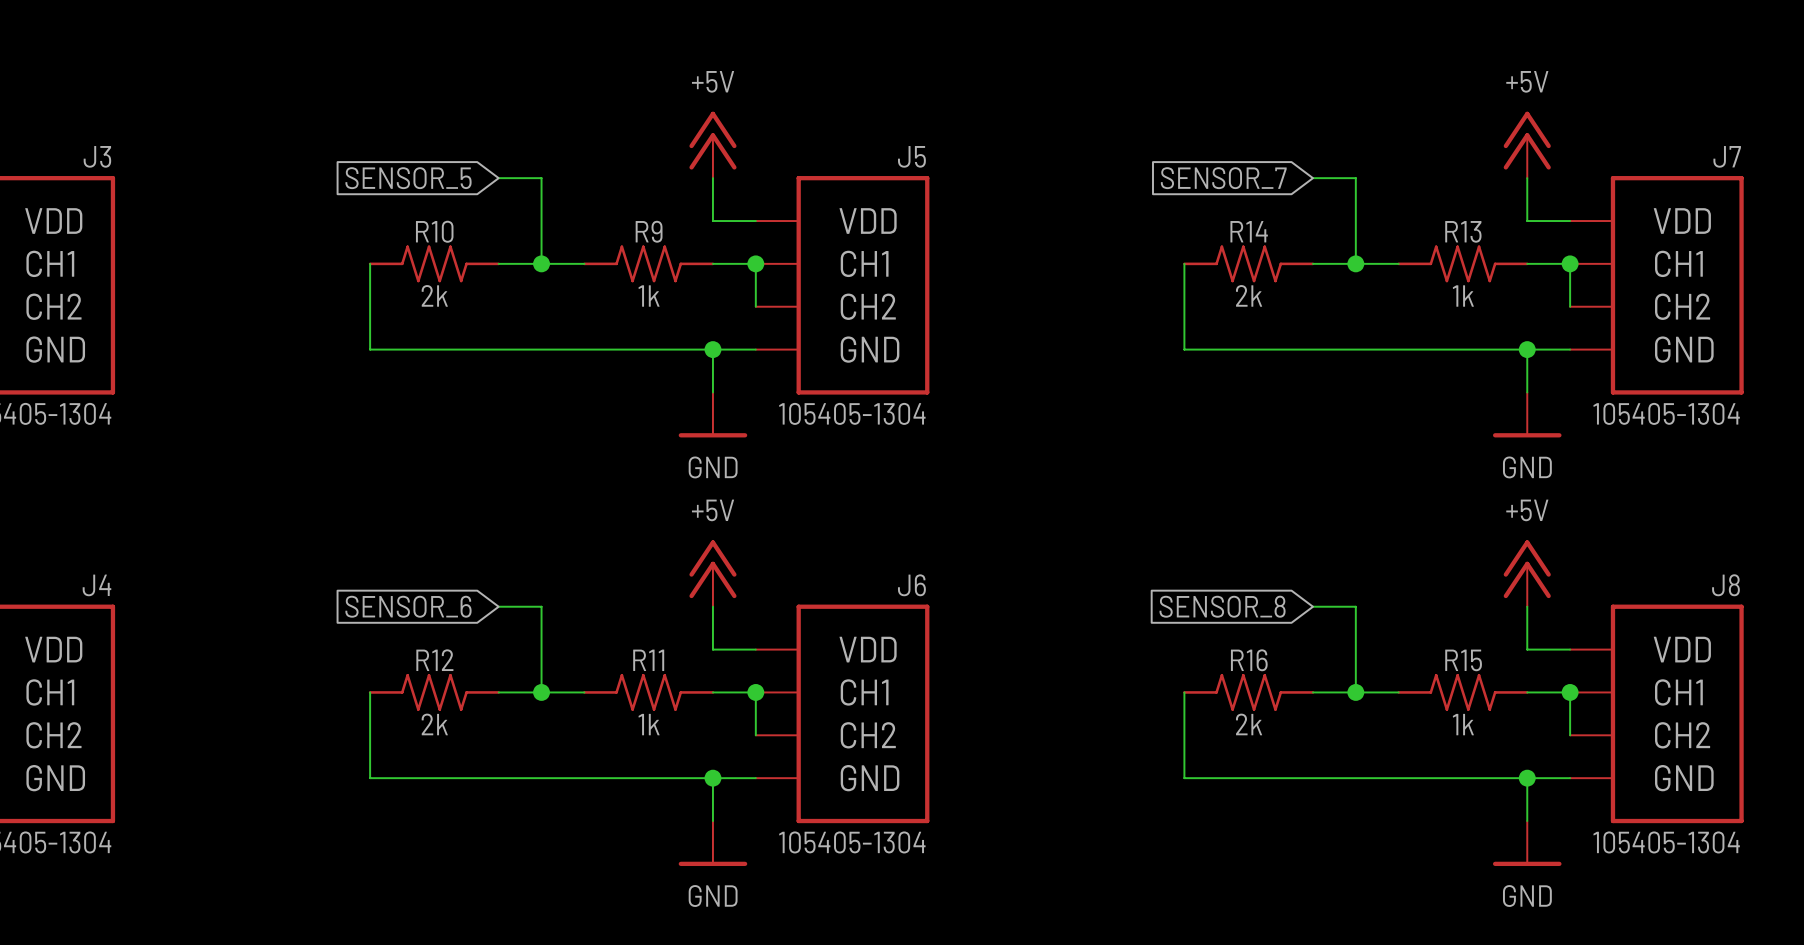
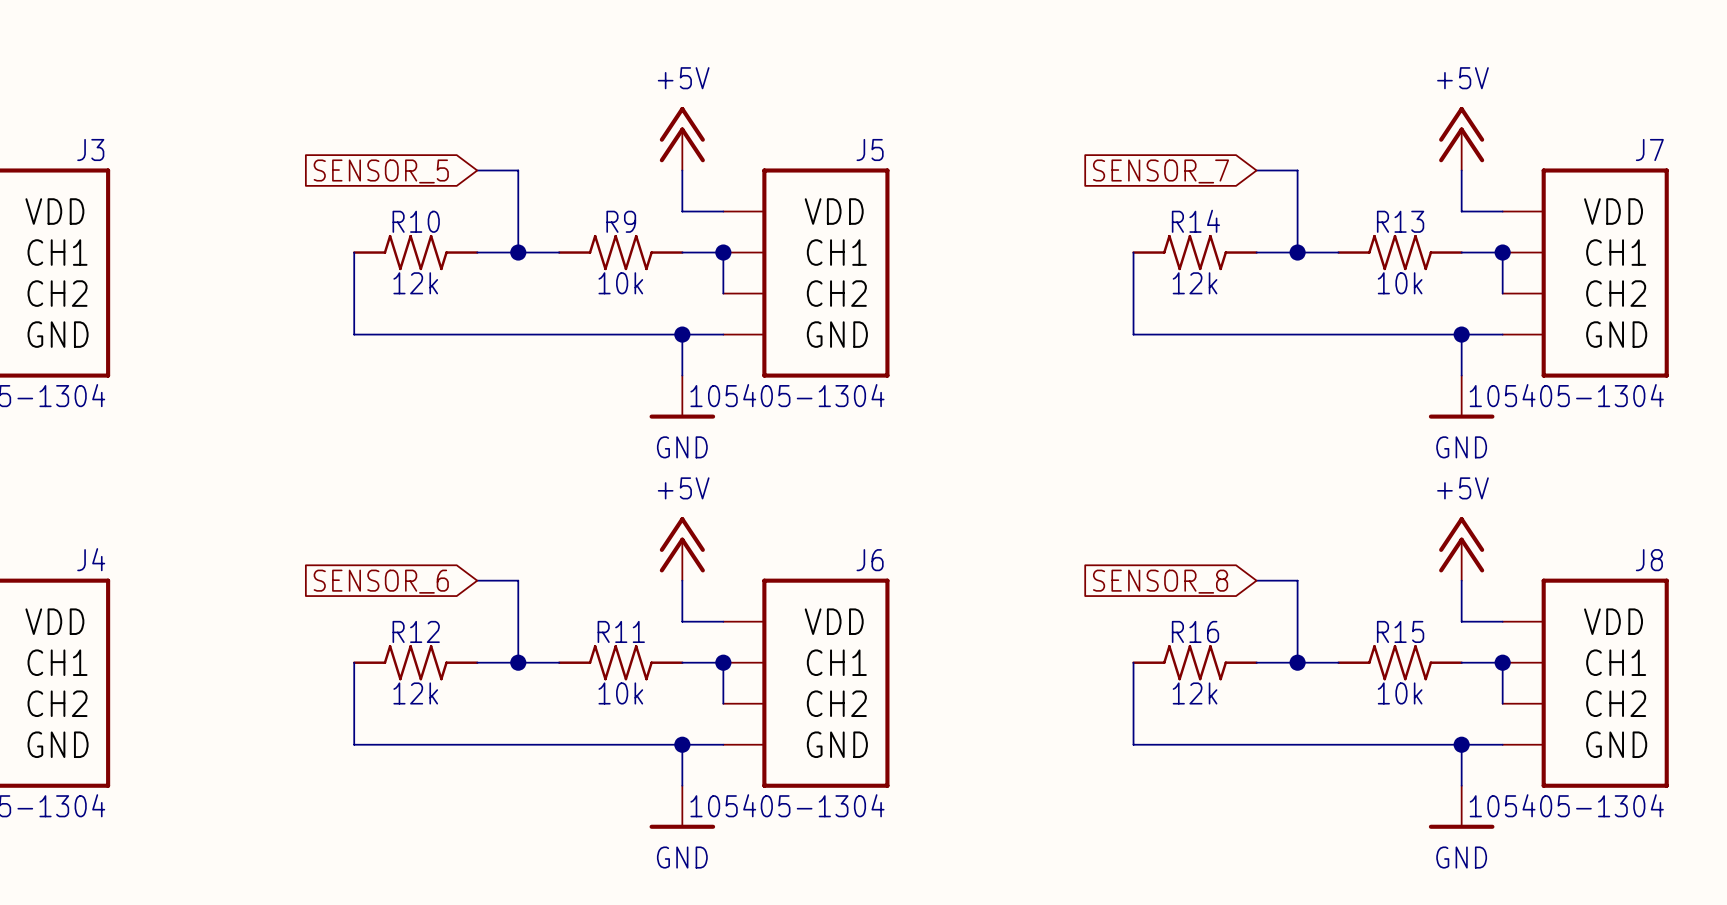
R10 text: 2k (434, 295) -> 12k (415, 283)
R14 text: 2k (1249, 295) -> 12k (1195, 283)
R9 text: 1k (649, 296) -> 10k (620, 283)
R13 text: 1k (1463, 296) -> 10k (1400, 283)
R12 text: 2k (434, 724) -> 12k (415, 693)
R11 text: 1k (649, 724) -> 10k (620, 693)
R16 text: 2k (1249, 724) -> 12k (1195, 693)
R15 text: 1k (1463, 724) -> 10k (1400, 693)

